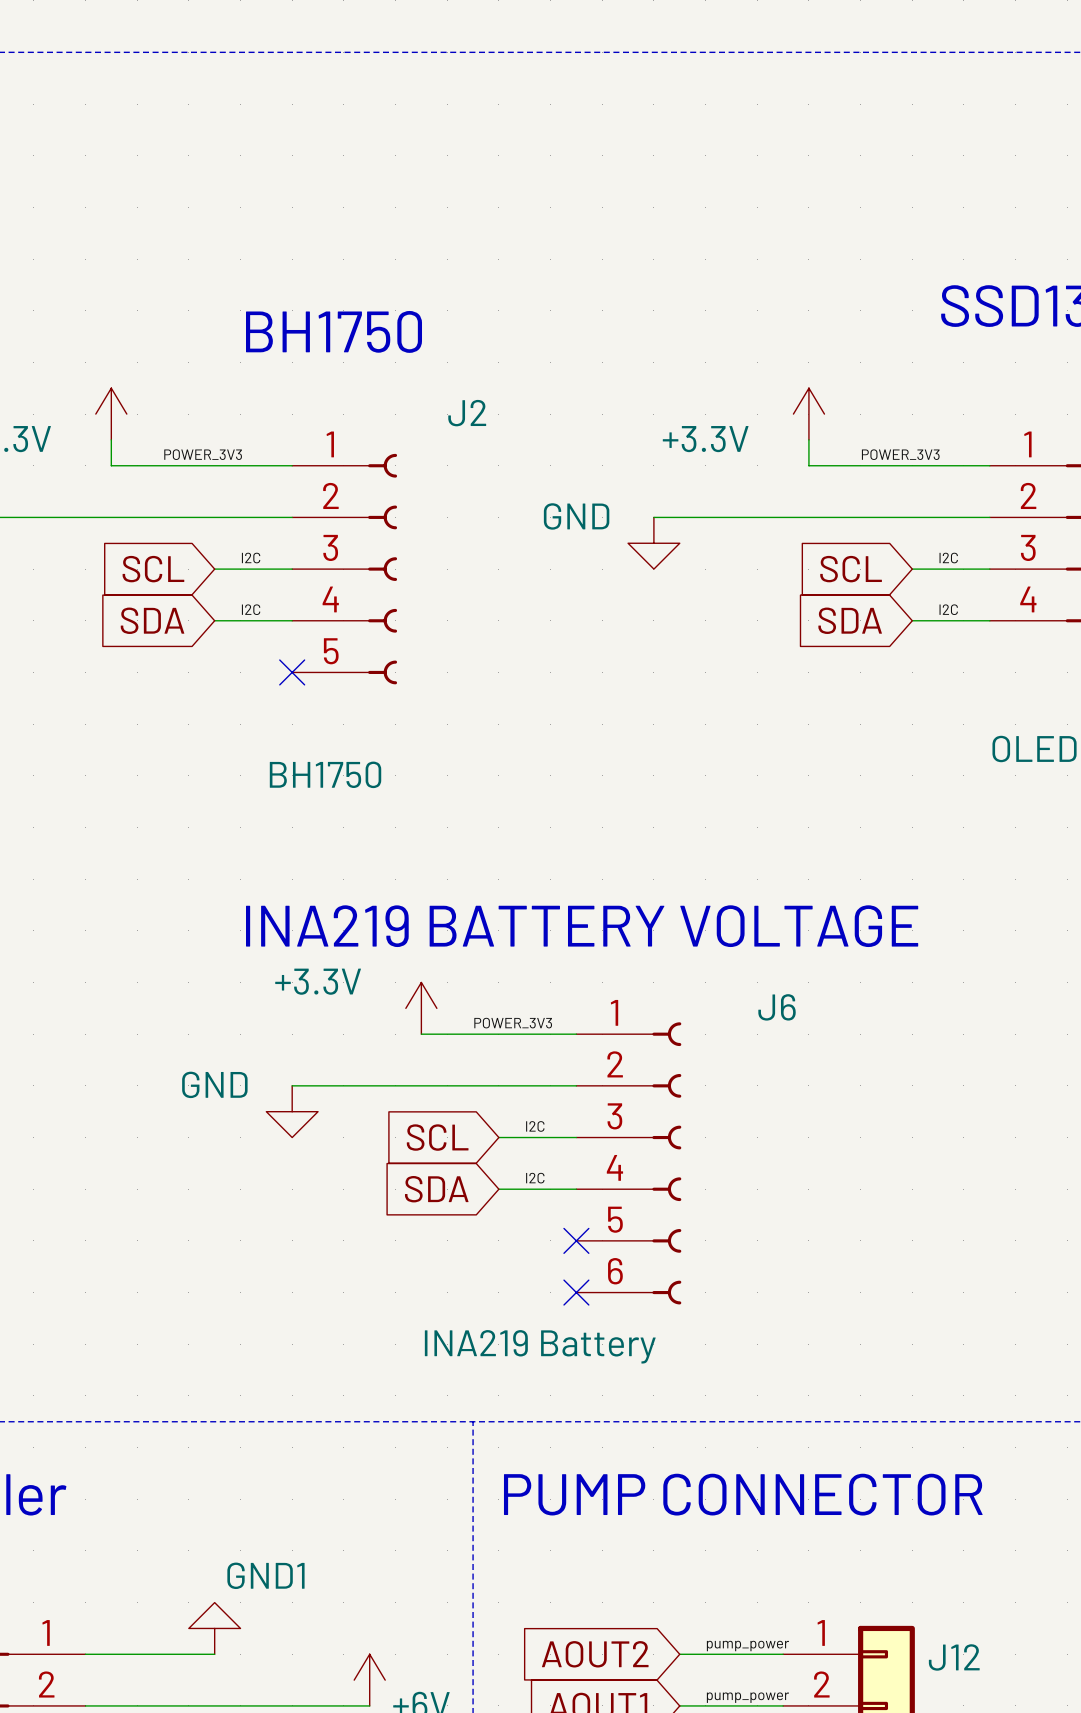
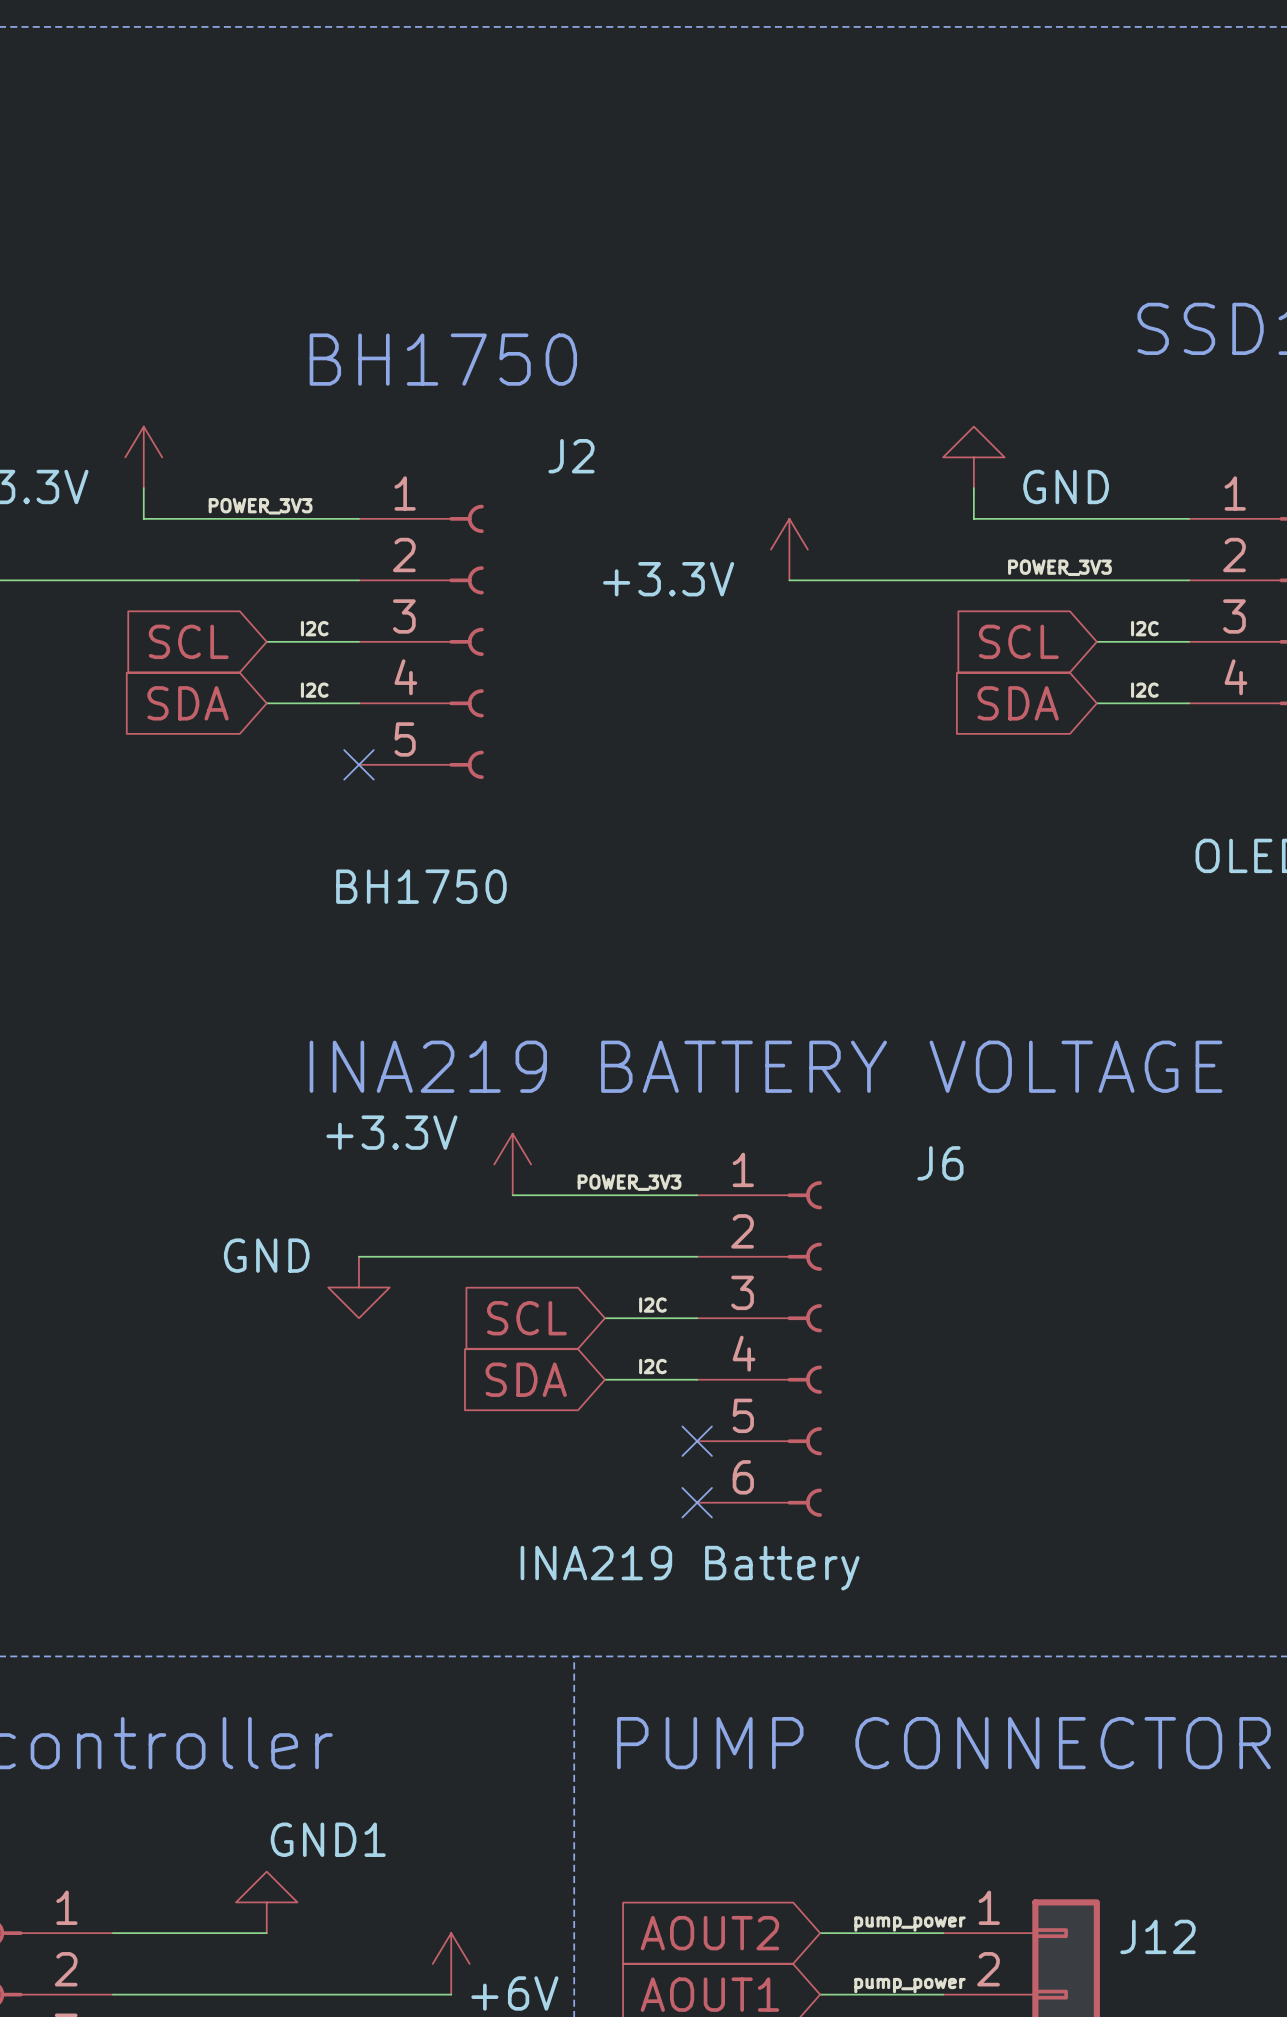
power symbol: +3.3V (808, 414) -> GND (973, 457)
label position: POWER_3V3 (900, 454) -> POWER_3V3 (1059, 567)
power symbol: none -> +3.3V (789, 549)
power symbol: GND (653, 543) -> none

